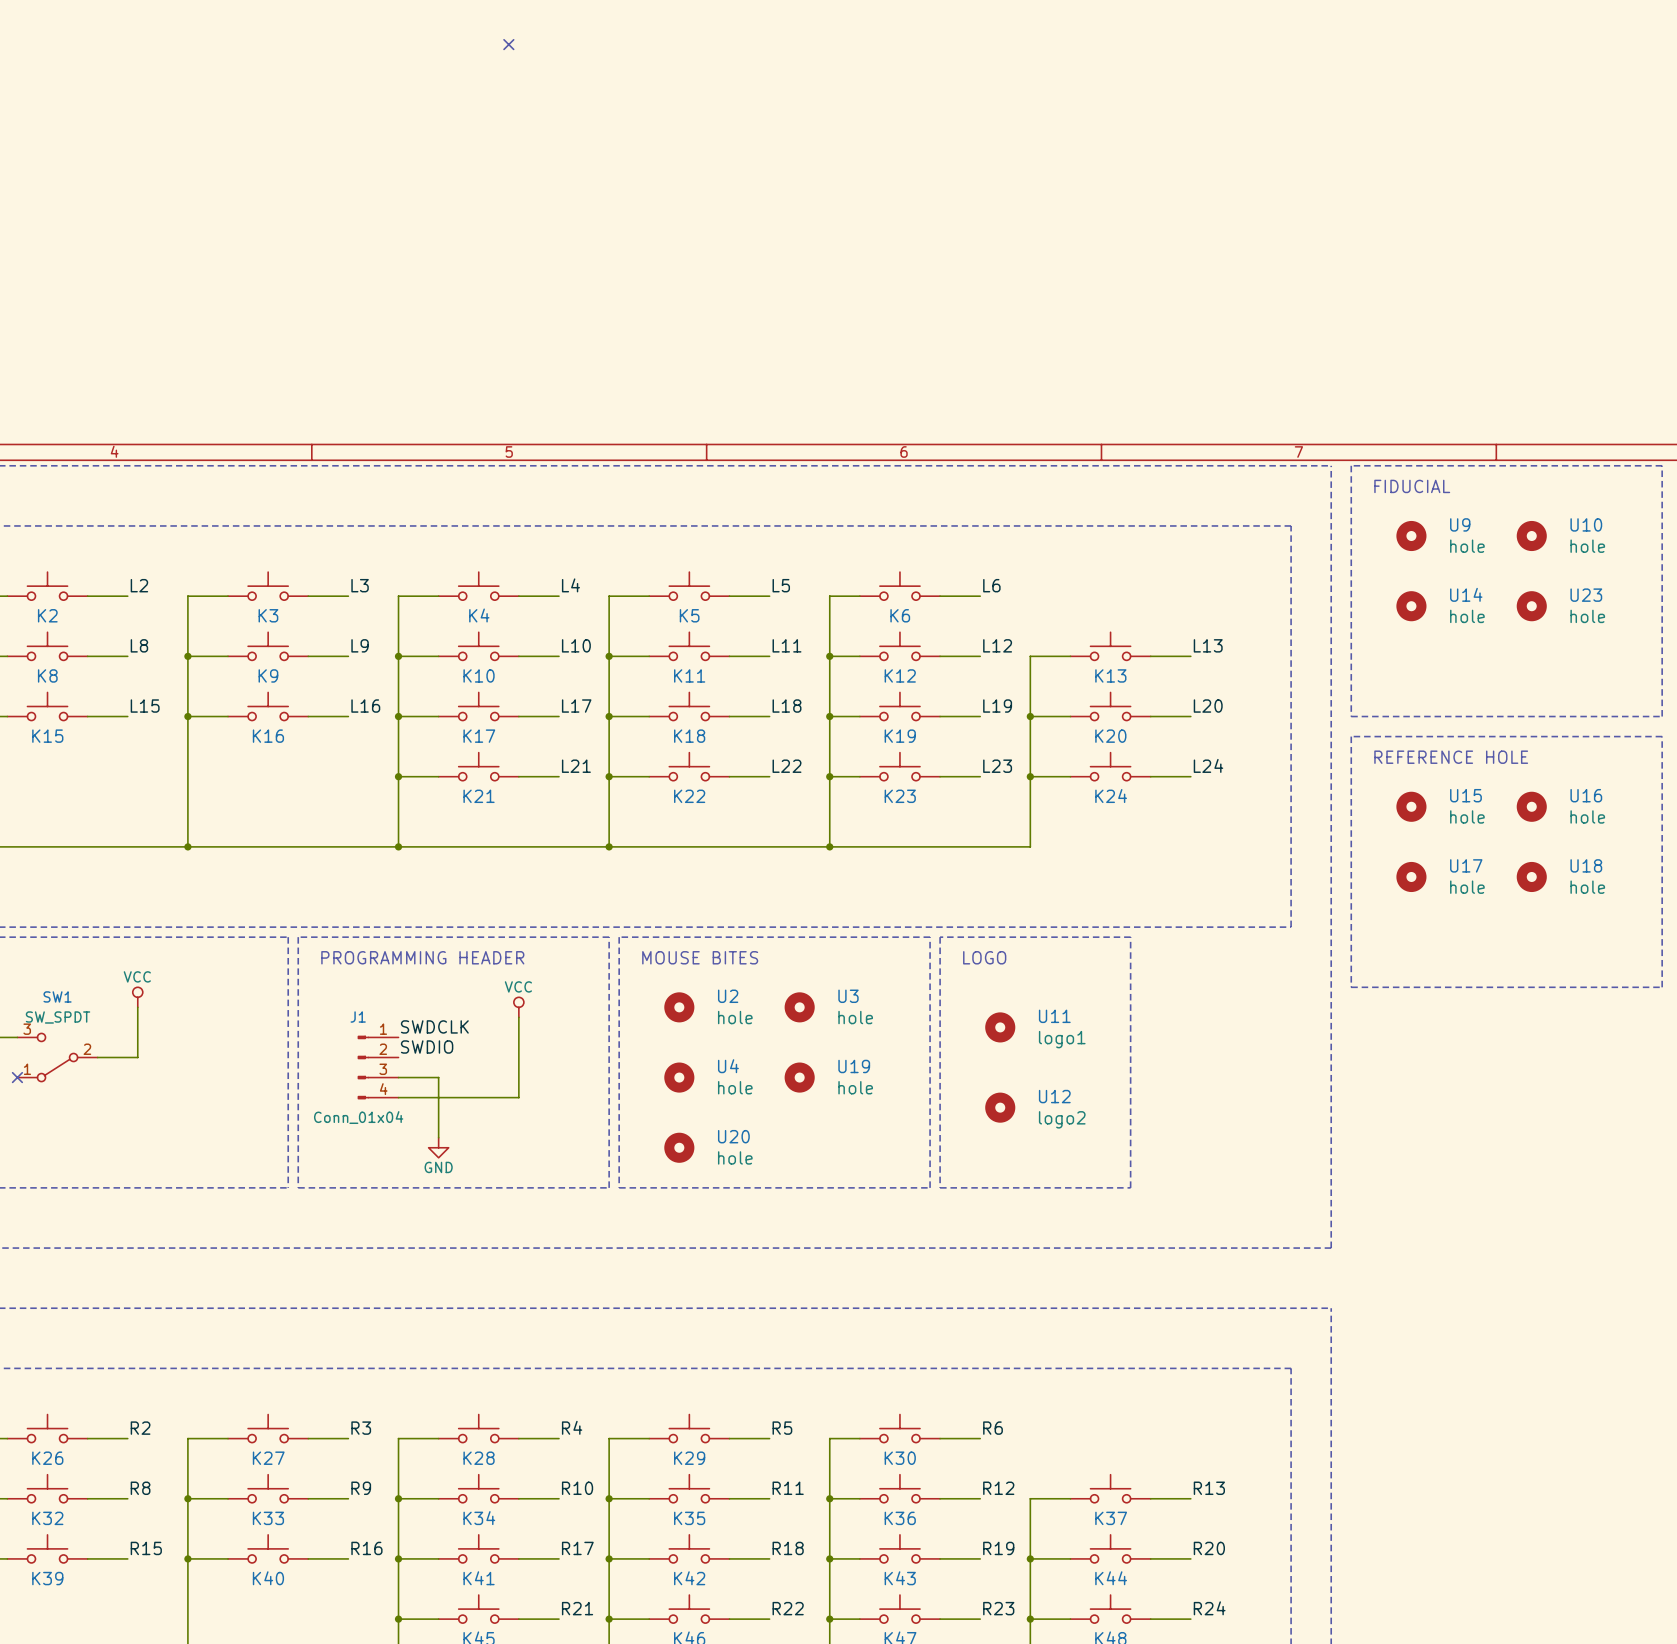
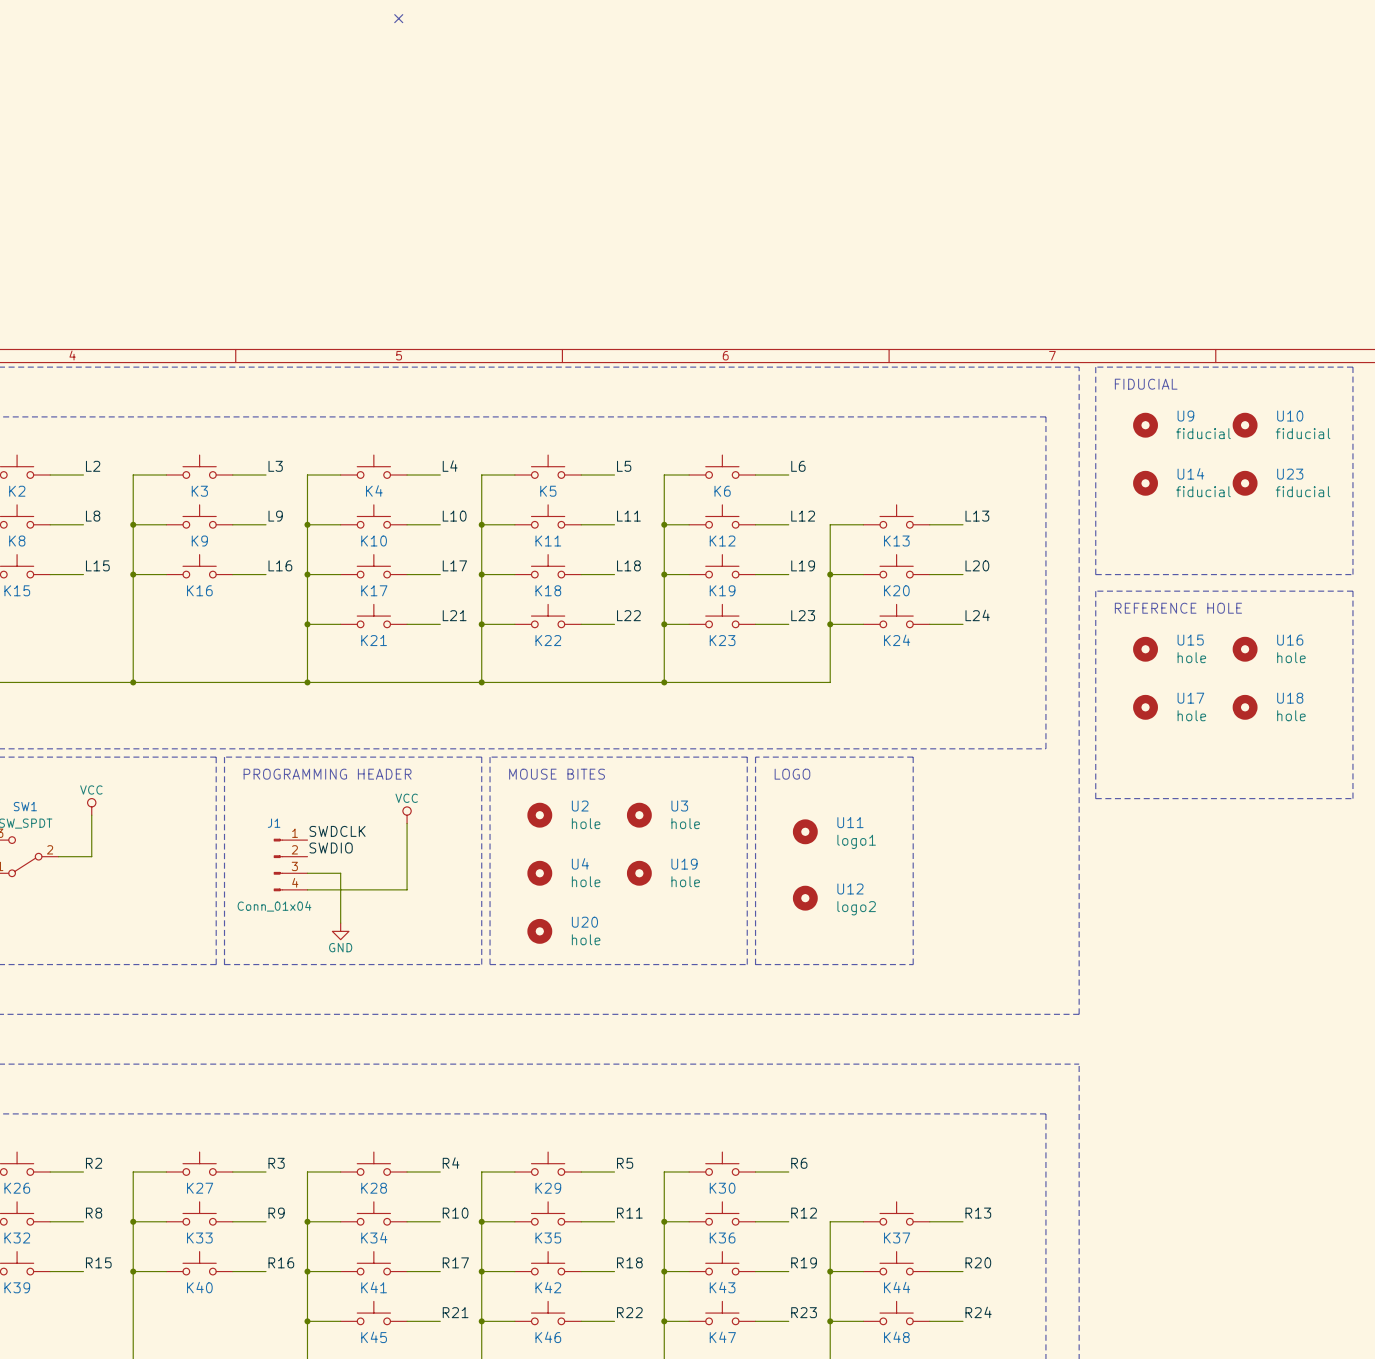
U9 value: hole (1467, 546) -> fiducial (1203, 433)
U10 value: hole (1587, 546) -> fiducial (1303, 433)
U14 value: hole (1467, 616) -> fiducial (1203, 491)
U23 value: hole (1587, 616) -> fiducial (1303, 491)

